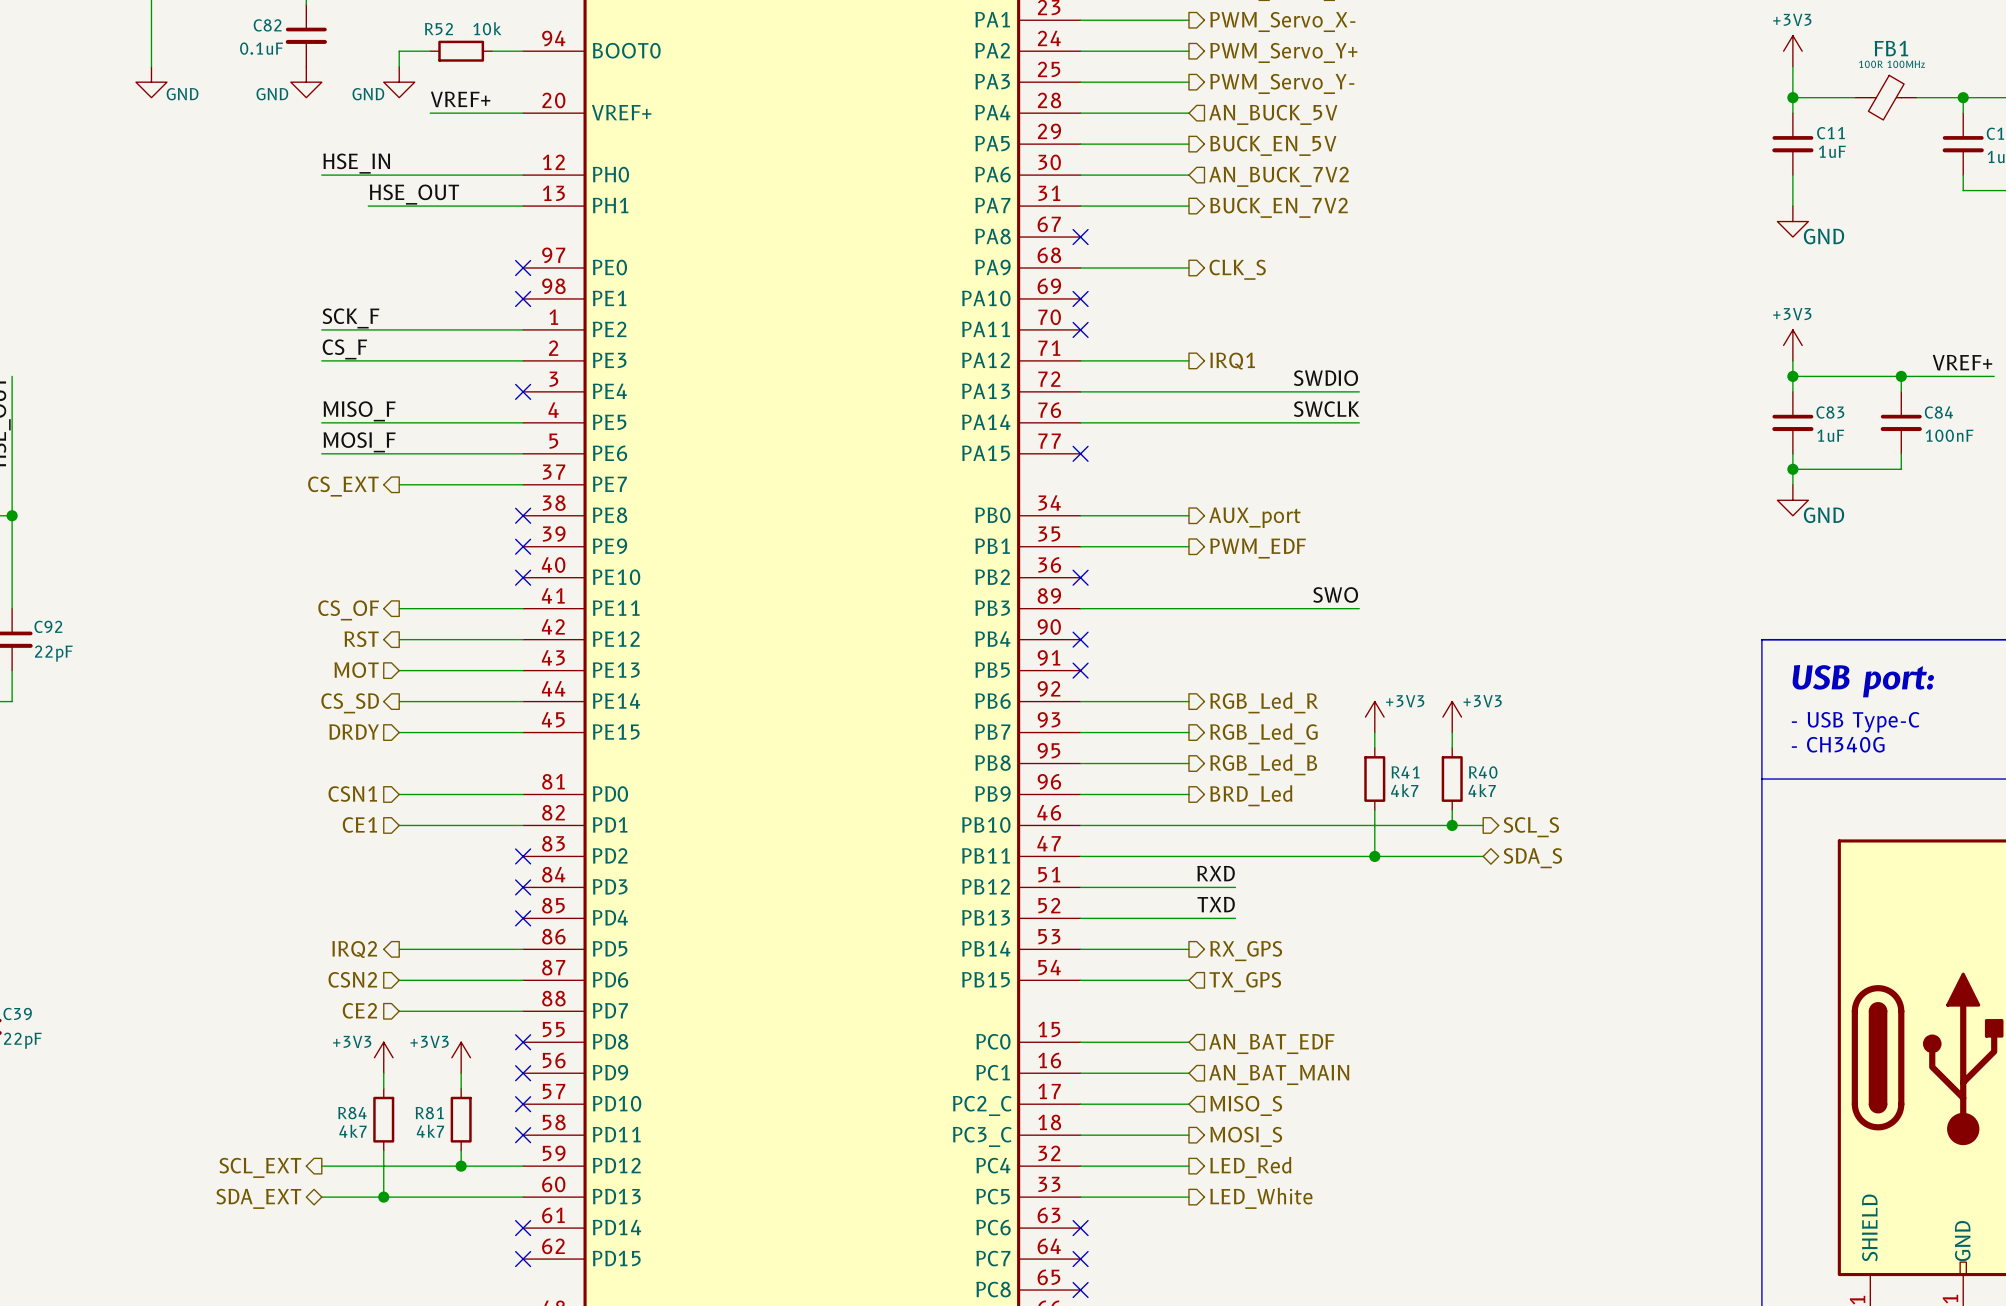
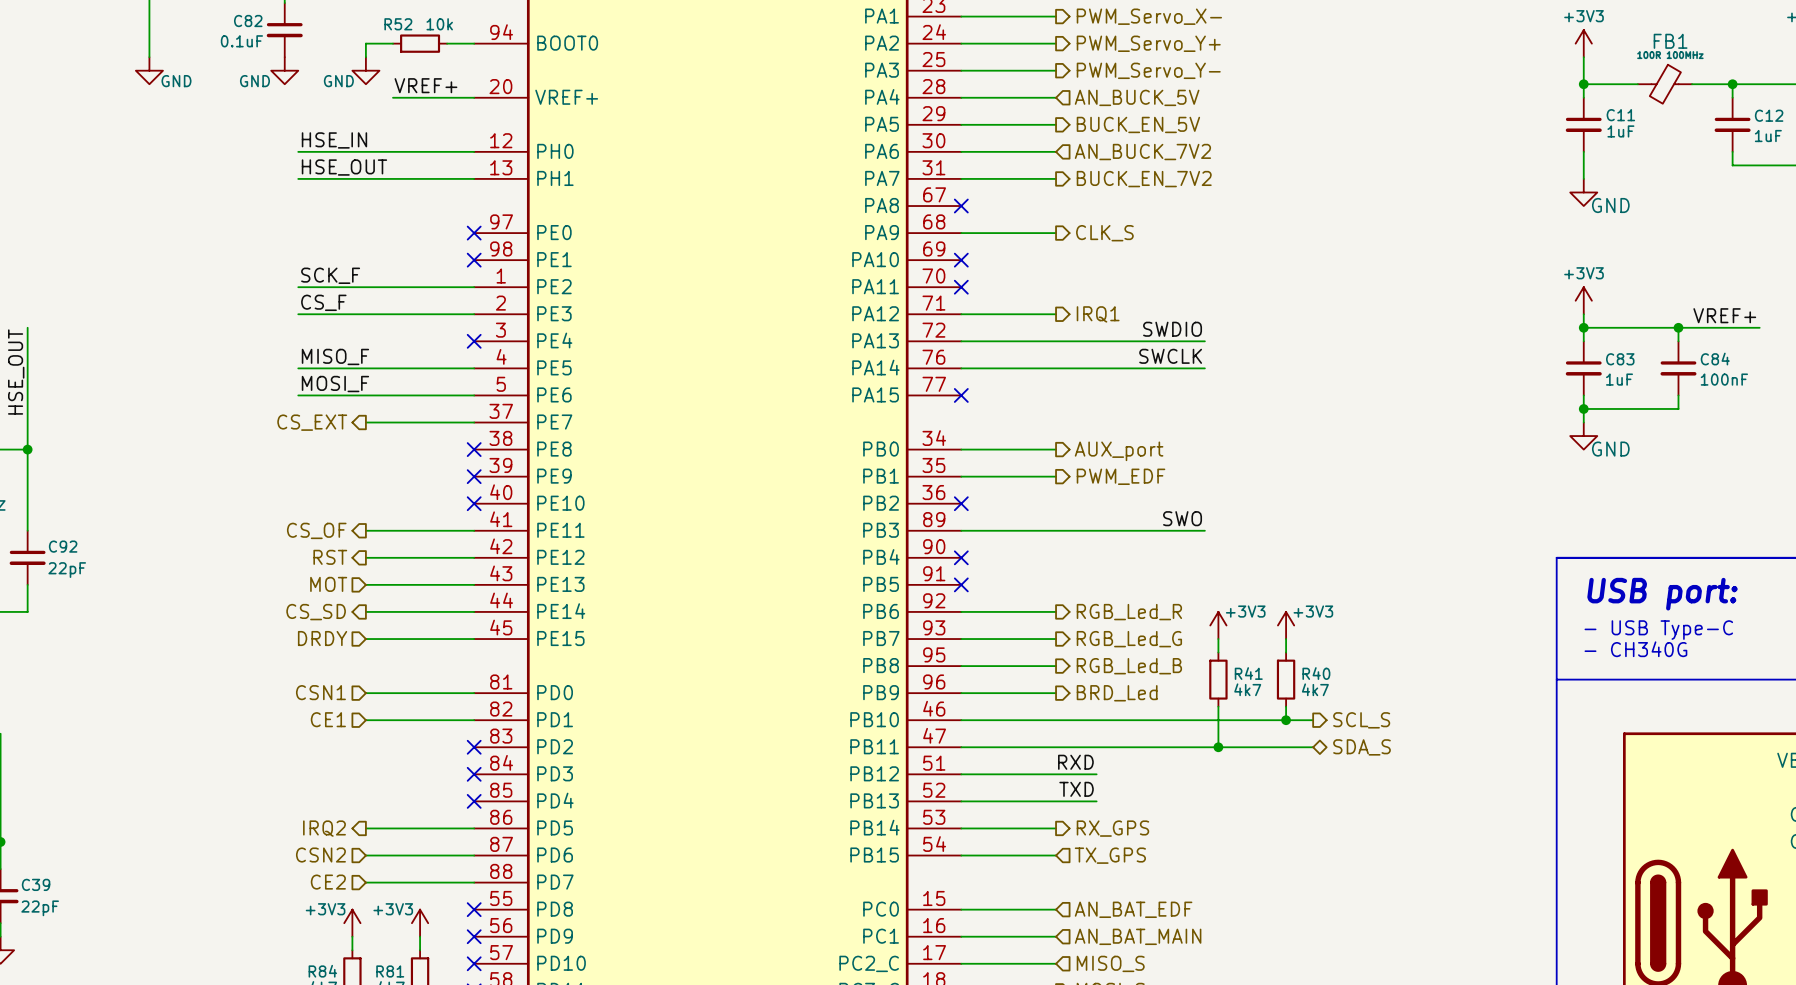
label position: HSE_OUT (414, 194) -> HSE_OUT (344, 167)
wire: none -> (298, 178) (338, 178)

